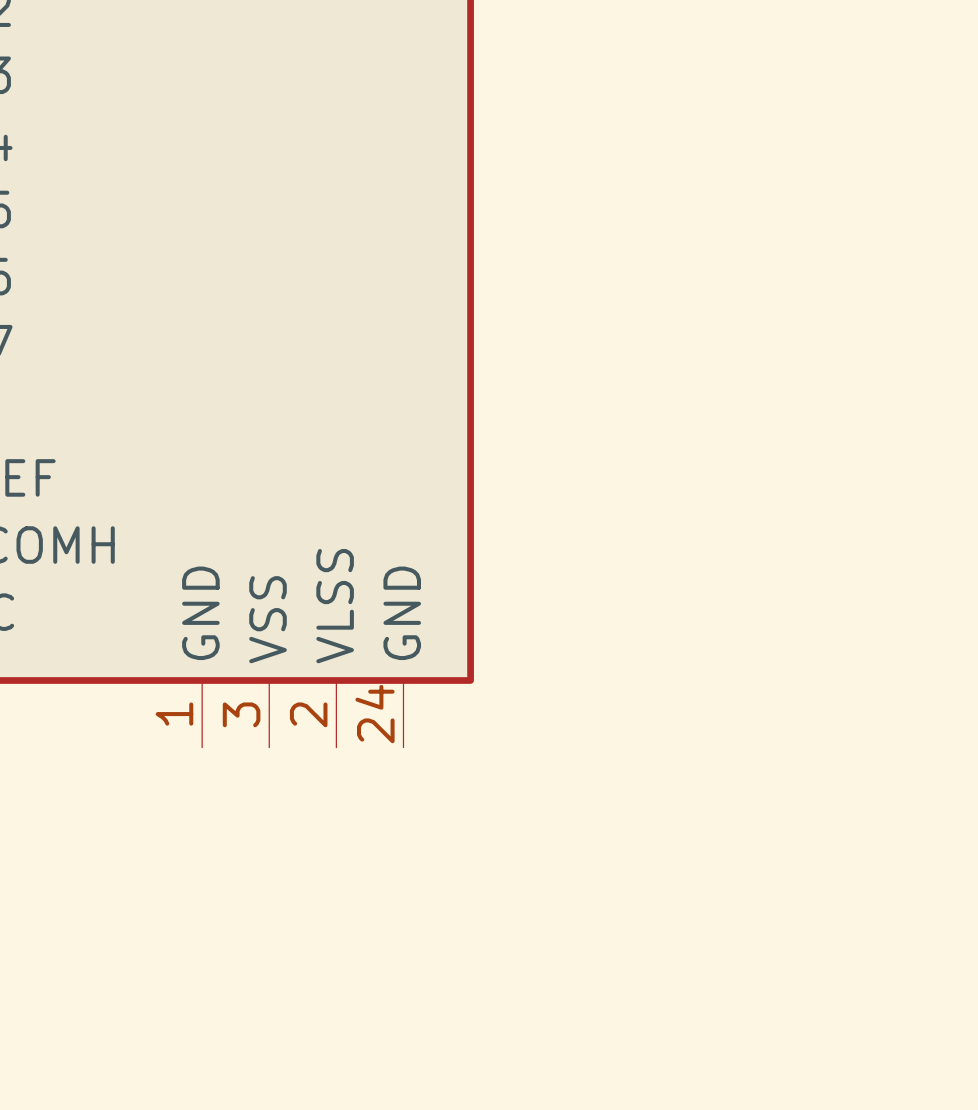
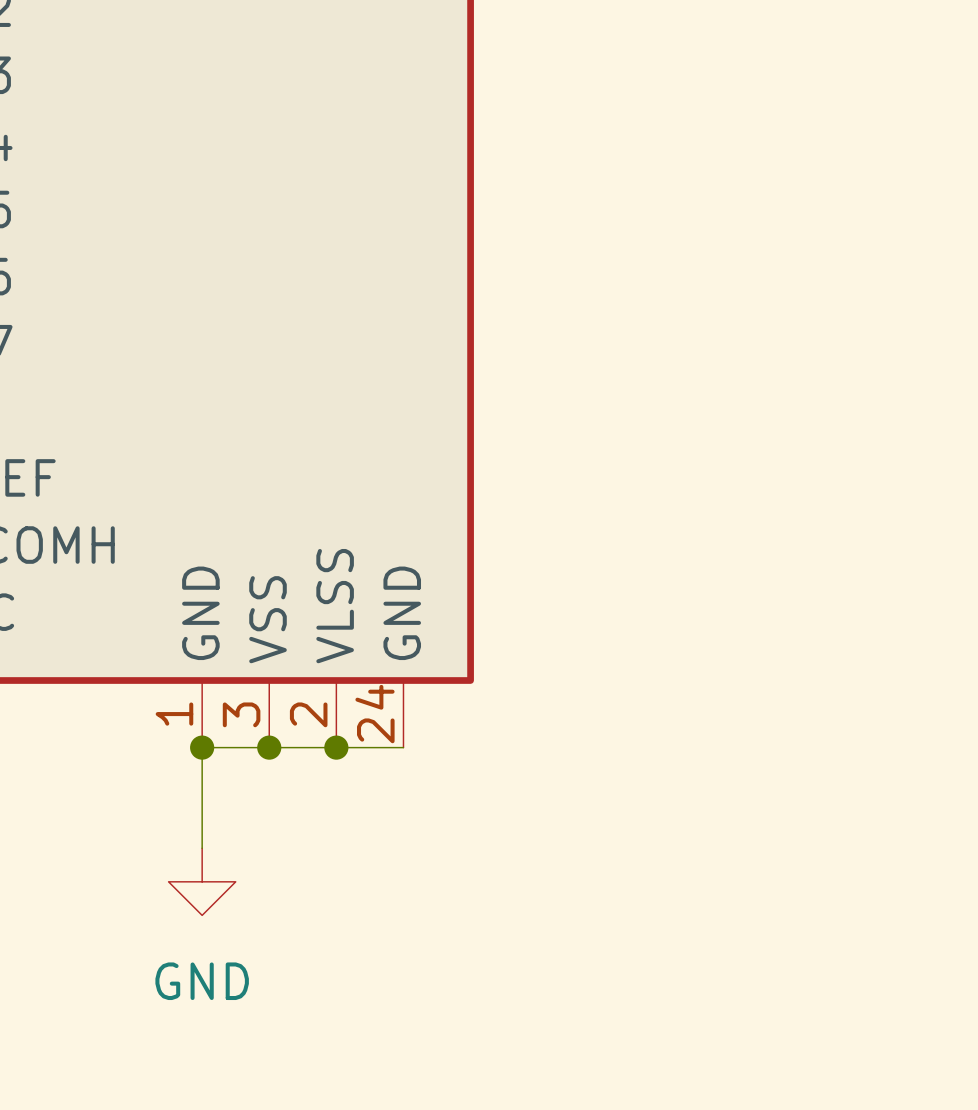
junction: none -> (202, 747)
junction: none -> (269, 747)
junction: none -> (336, 747)
wire: none -> (403, 747) (202, 747) (202, 848)
power symbol: none -> GND (202, 881)

